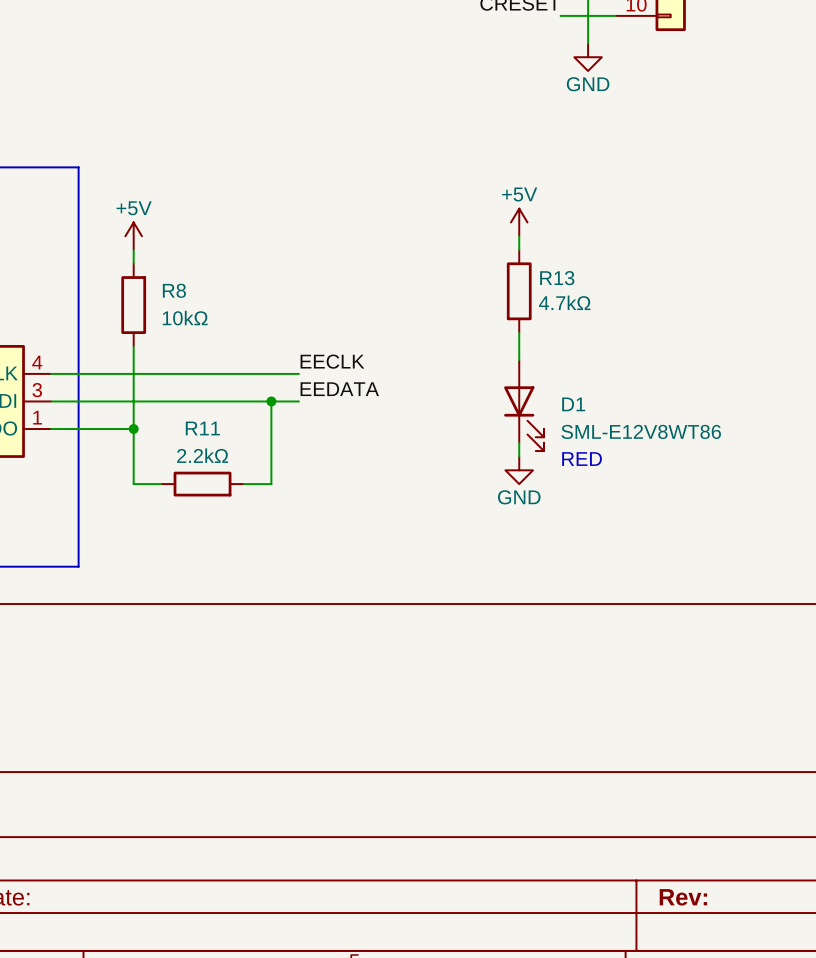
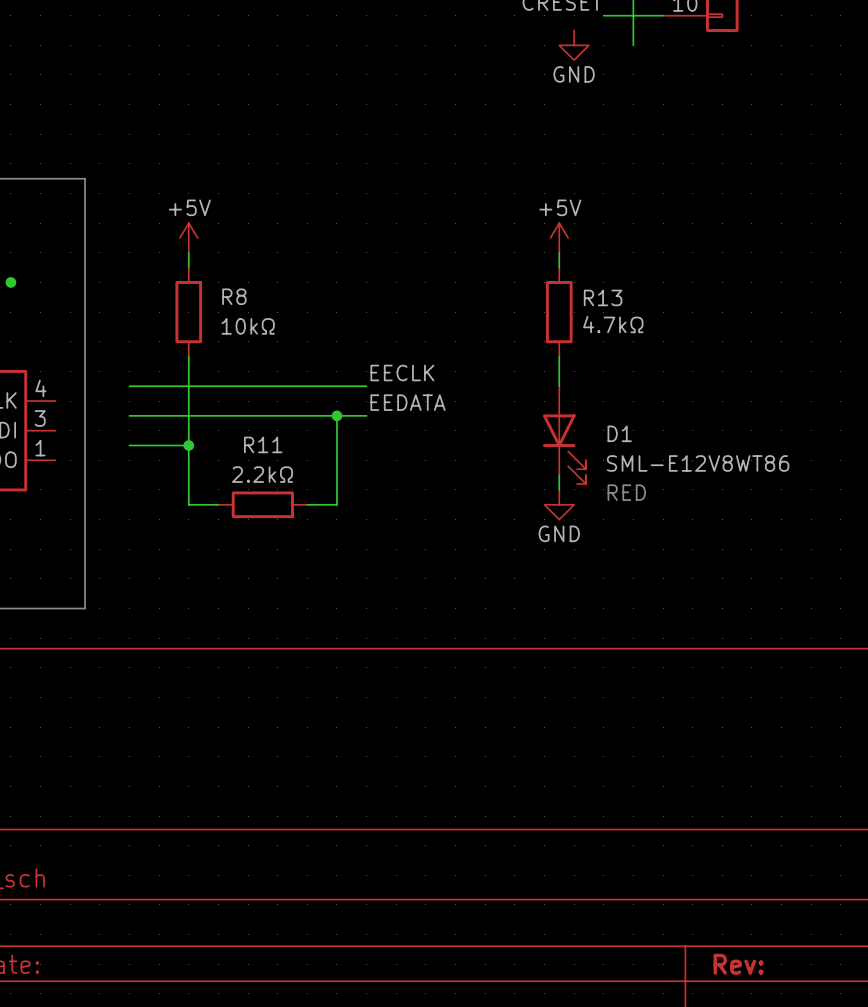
power symbol position: GND (588, 57) -> GND (574, 45)
power symbol position: +5V (133, 236) -> +5V (188, 238)
wire: (133, 250) (133, 263) -> (188, 252) (188, 267)
junction: none -> (10, 282)
R8 position: (133, 305) -> (188, 312)
wire: (133, 346) (133, 484) (161, 484) -> (188, 356) (188, 504) (218, 504)
wire: none -> (129, 386) (366, 386)
label position: EECLK (332, 361) -> EECLK (402, 372)
wire: (51, 373) (298, 373) -> none
wire: none -> (129, 415) (366, 415)
label position: EEDATA (339, 389) -> EEDATA (408, 402)
wire: (51, 401) (298, 401) -> none
wire: (271, 401) (271, 484) (243, 484) -> (336, 415) (336, 504) (307, 504)
junction position: (271, 401) -> (336, 415)
wire: none -> (129, 445) (188, 445)
wire: (51, 429) (133, 429) -> none
junction position: (133, 429) -> (188, 445)
R11 position: (202, 484) -> (262, 504)

